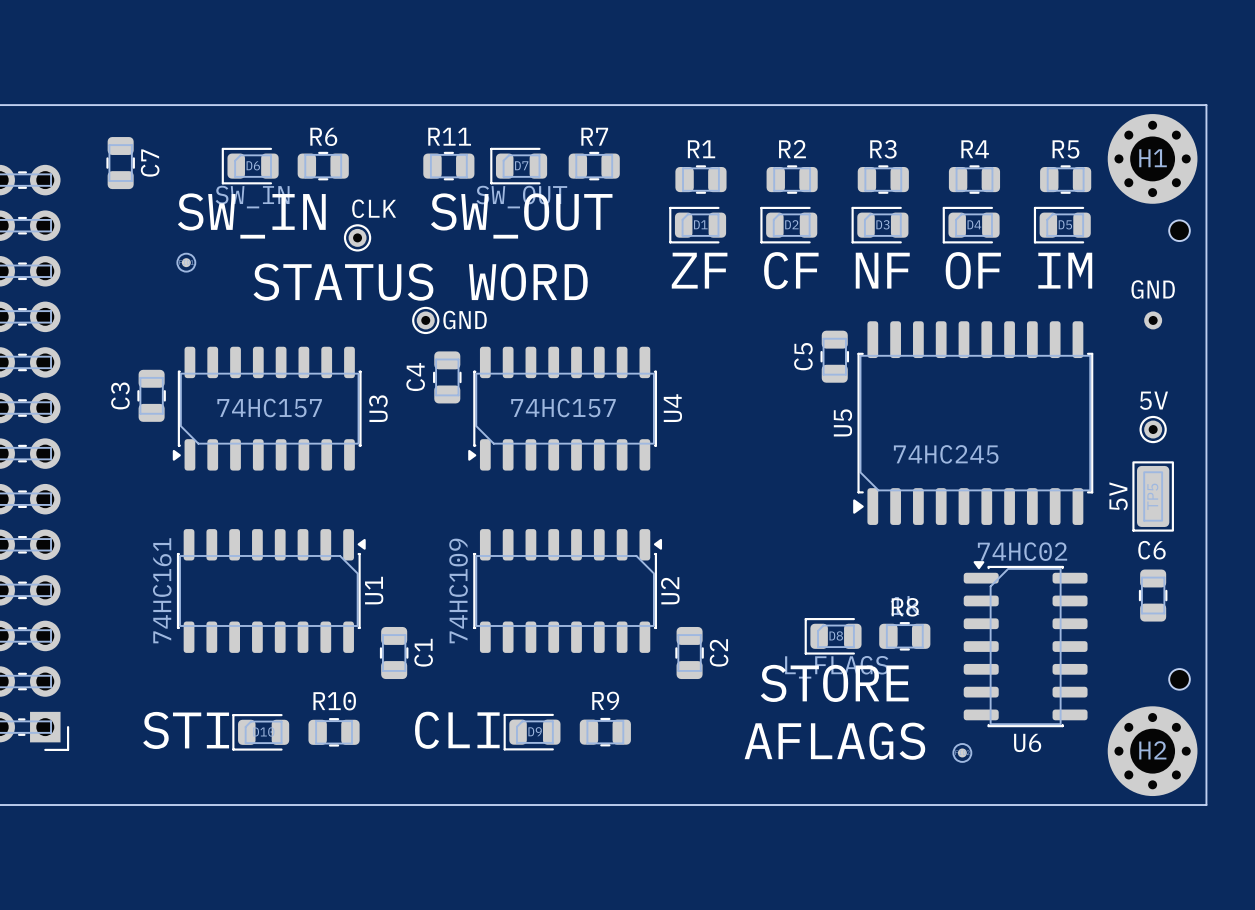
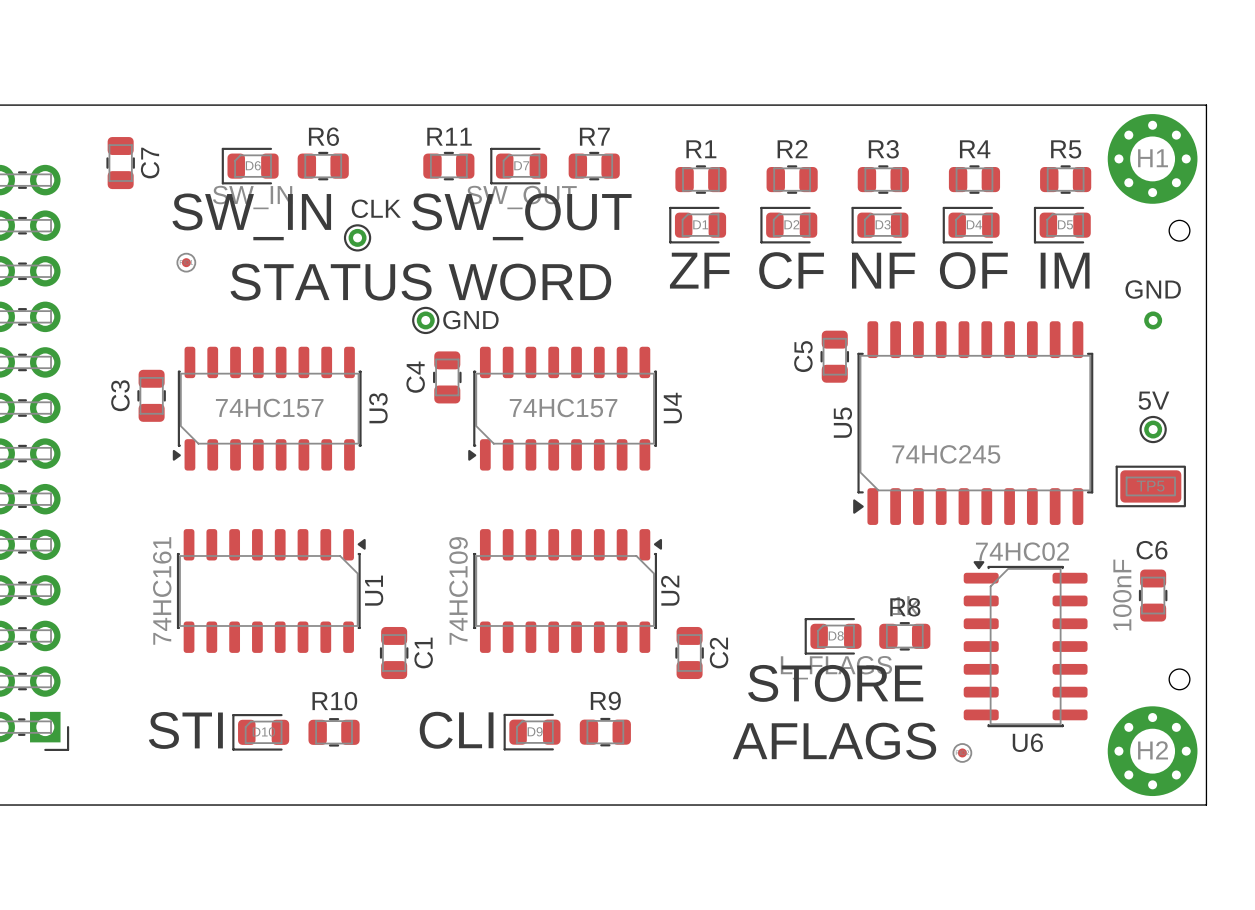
text: 5V (1118, 496) -> none
part rotation: 0° (1153, 496) -> 90° clockwise (1150, 486)
C6 value: none -> 100nF (1122, 595)

